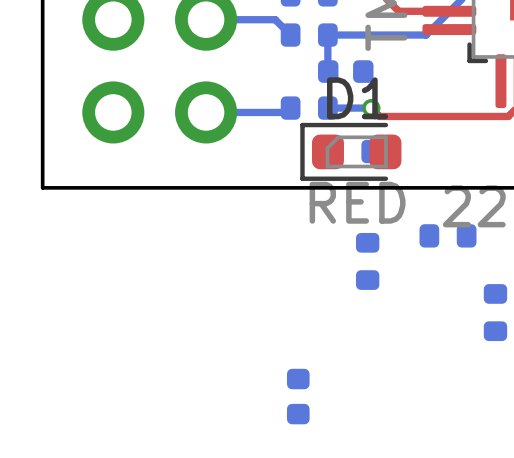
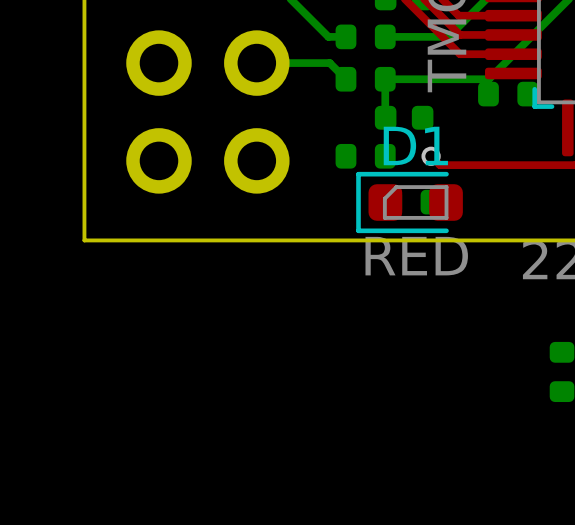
part: none -> (508, 94)
bottom track: (290, 108) (286, 112) (206, 112) -> none
bottom track: (327, 108) (371, 108) -> none
part: (448, 235) -> none
part: (367, 261) -> none
part: (298, 396) -> none

